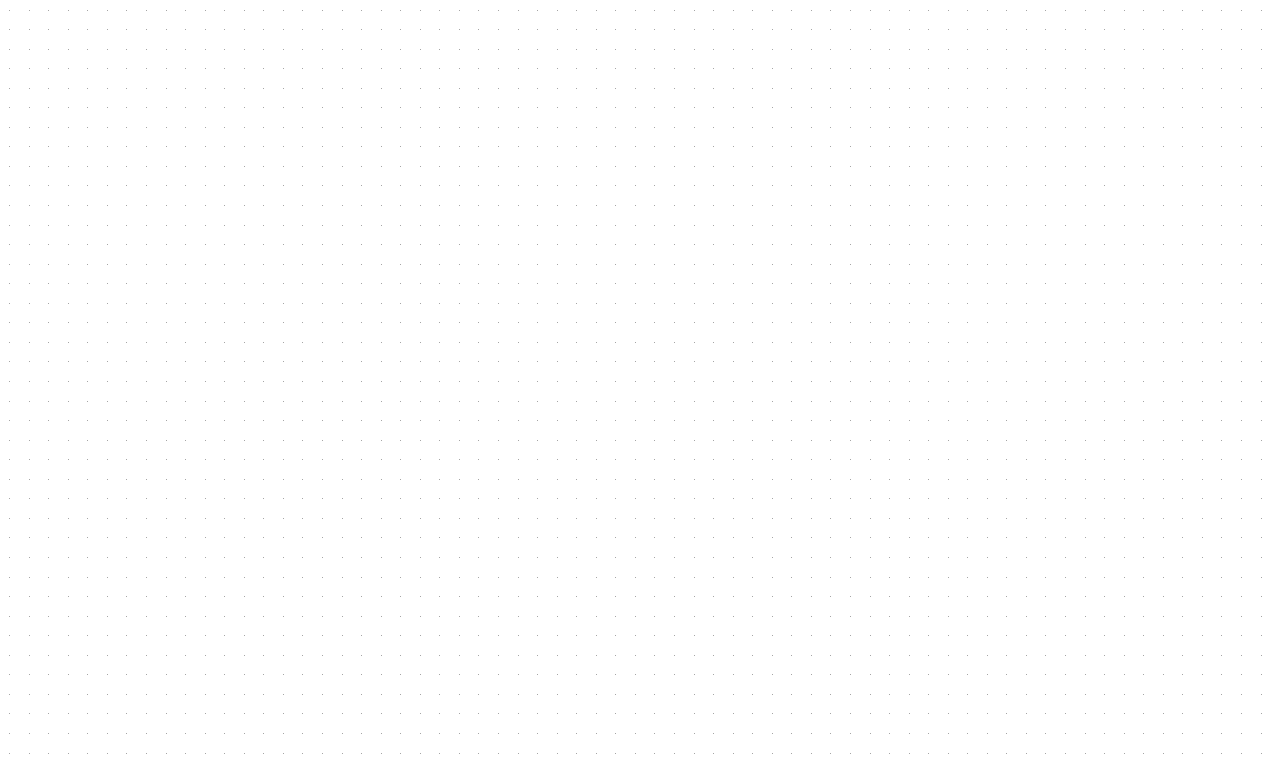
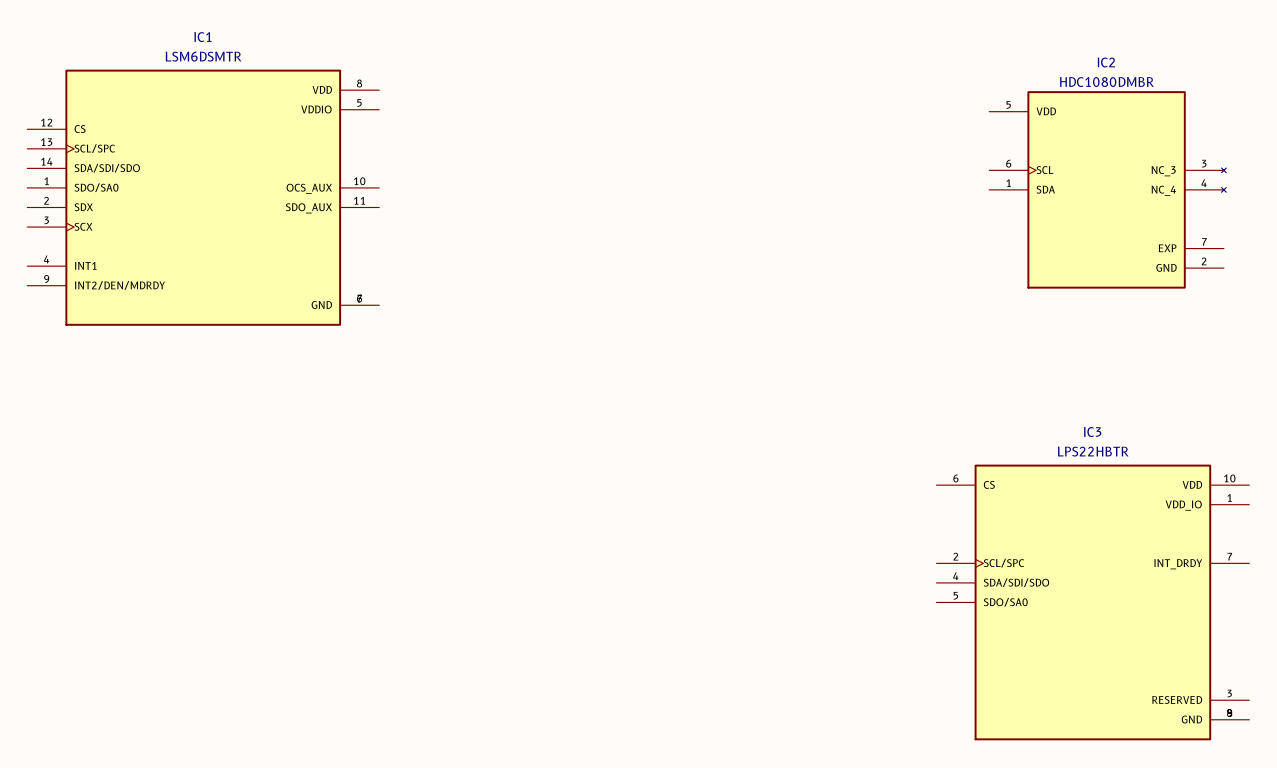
IC2: none -> HDC1080DMBR (1107, 189)
IC1: none -> LSM6DSMTR (203, 197)
IC3: none -> LPS22HBTR (1092, 602)

